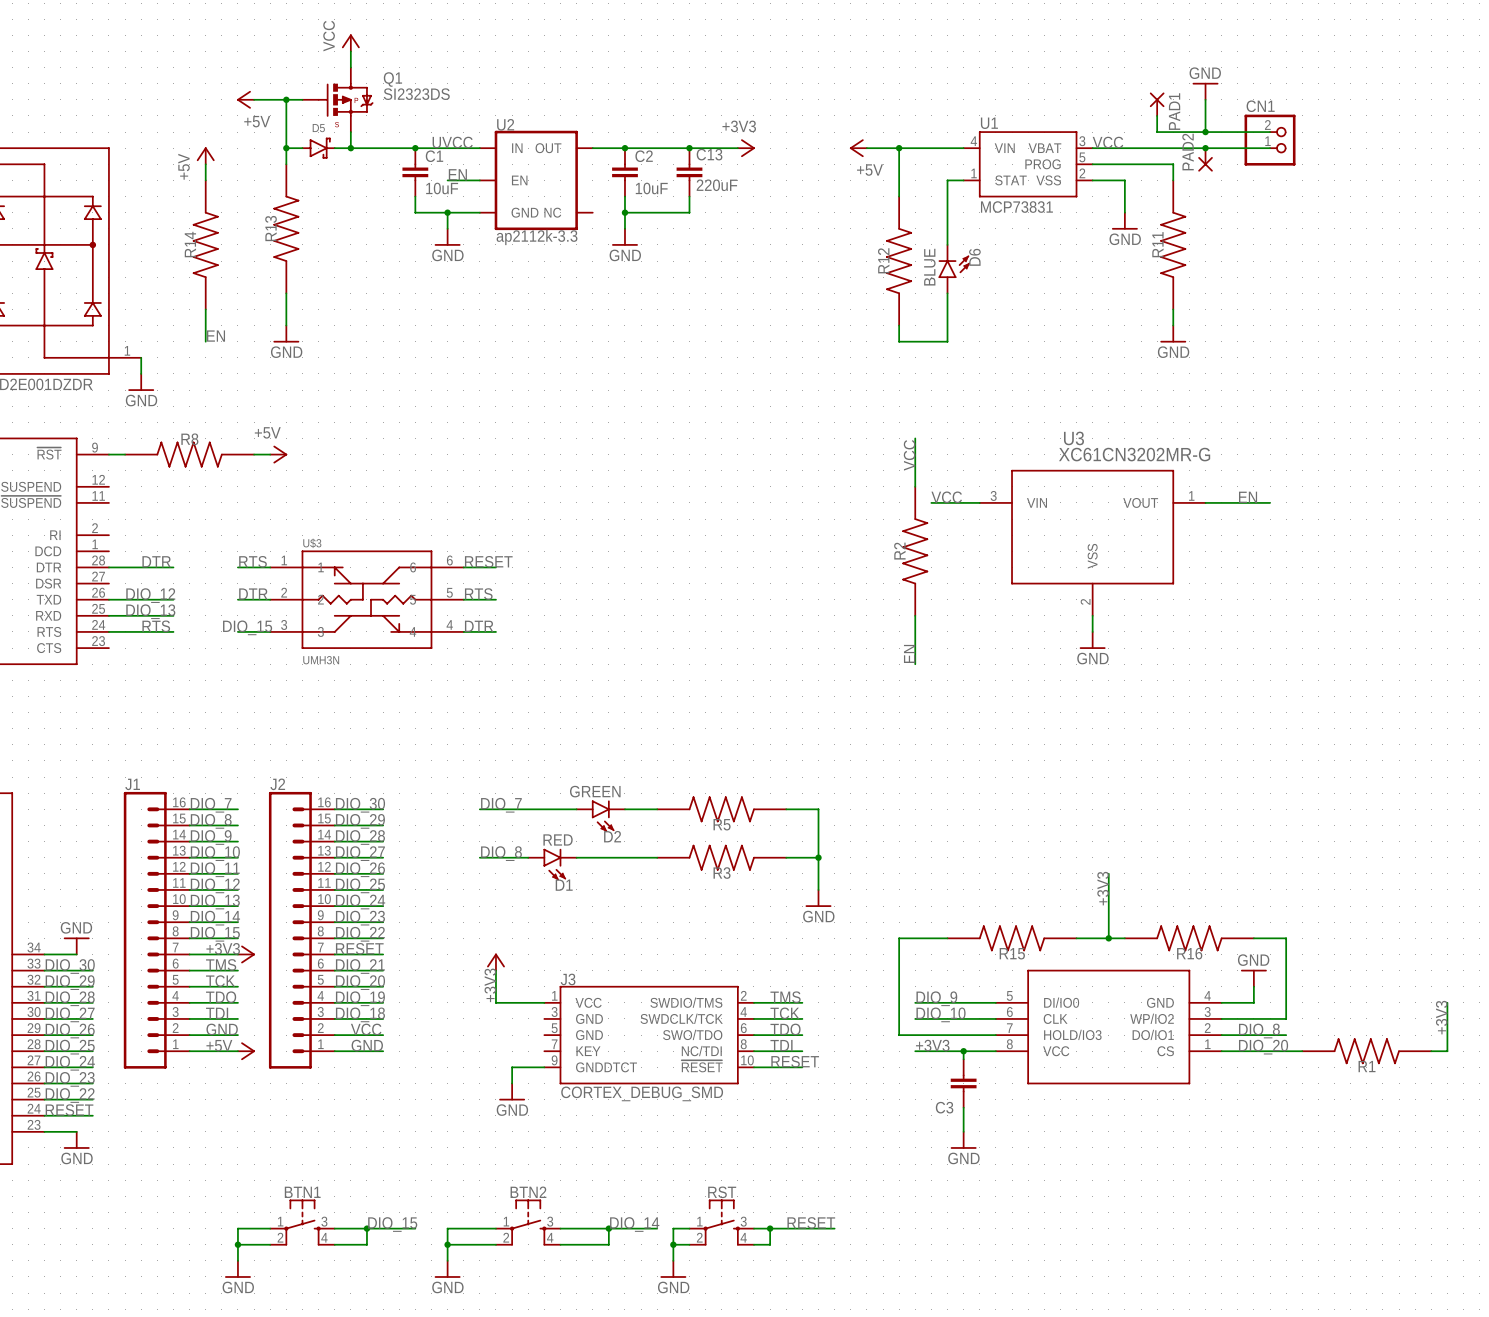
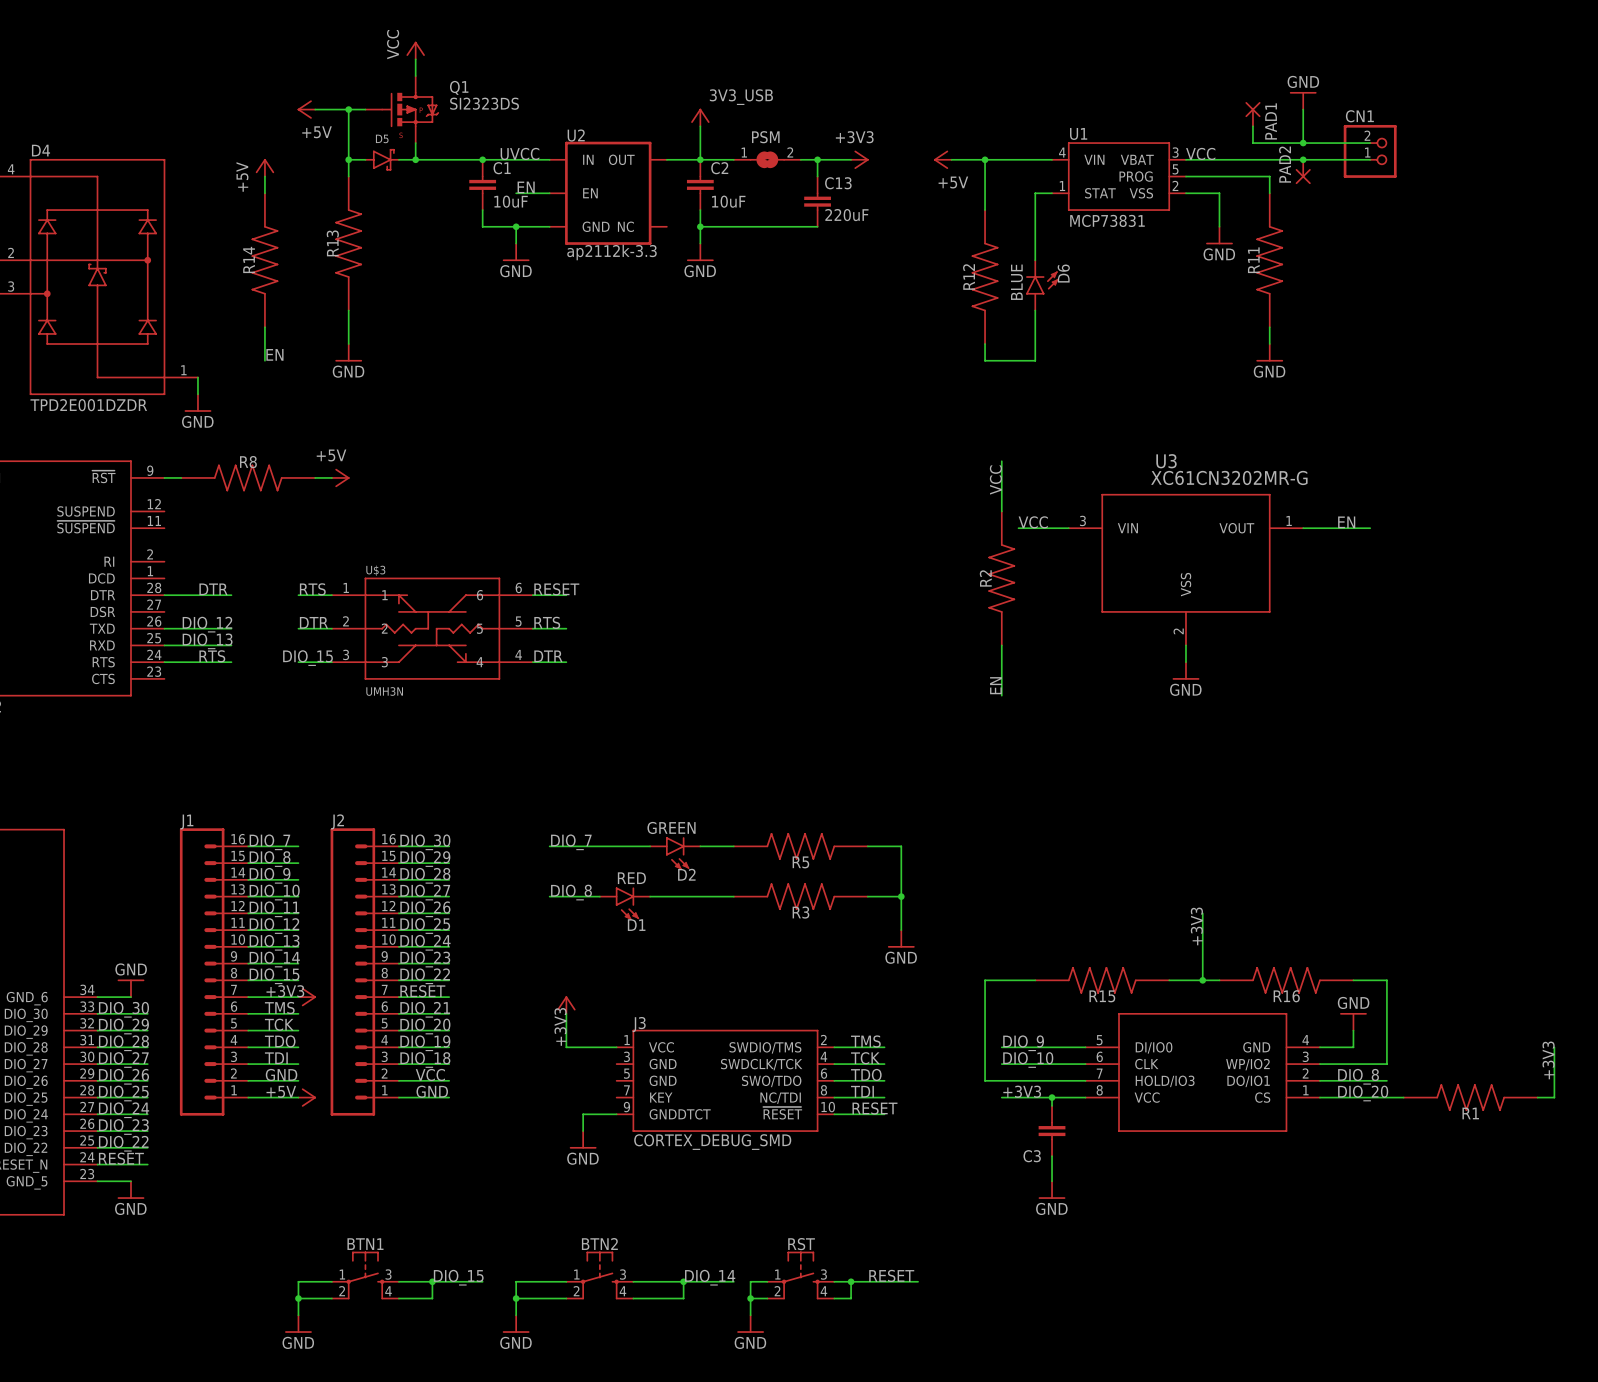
power symbol: none -> 3V3_USB (700, 117)
wire: none -> (700, 126) (700, 159)
PSM: none -> (767, 159)
junction: (689, 148) -> none
junction: none -> (817, 159)
power symbol position: +3V3 (746, 148) -> +3V3 (859, 159)
wire: none -> (851, 159) (817, 159) (817, 176)
C13 position: (689, 172) -> (817, 201)
wire: (689, 196) (689, 212) -> (817, 226) (767, 226)

